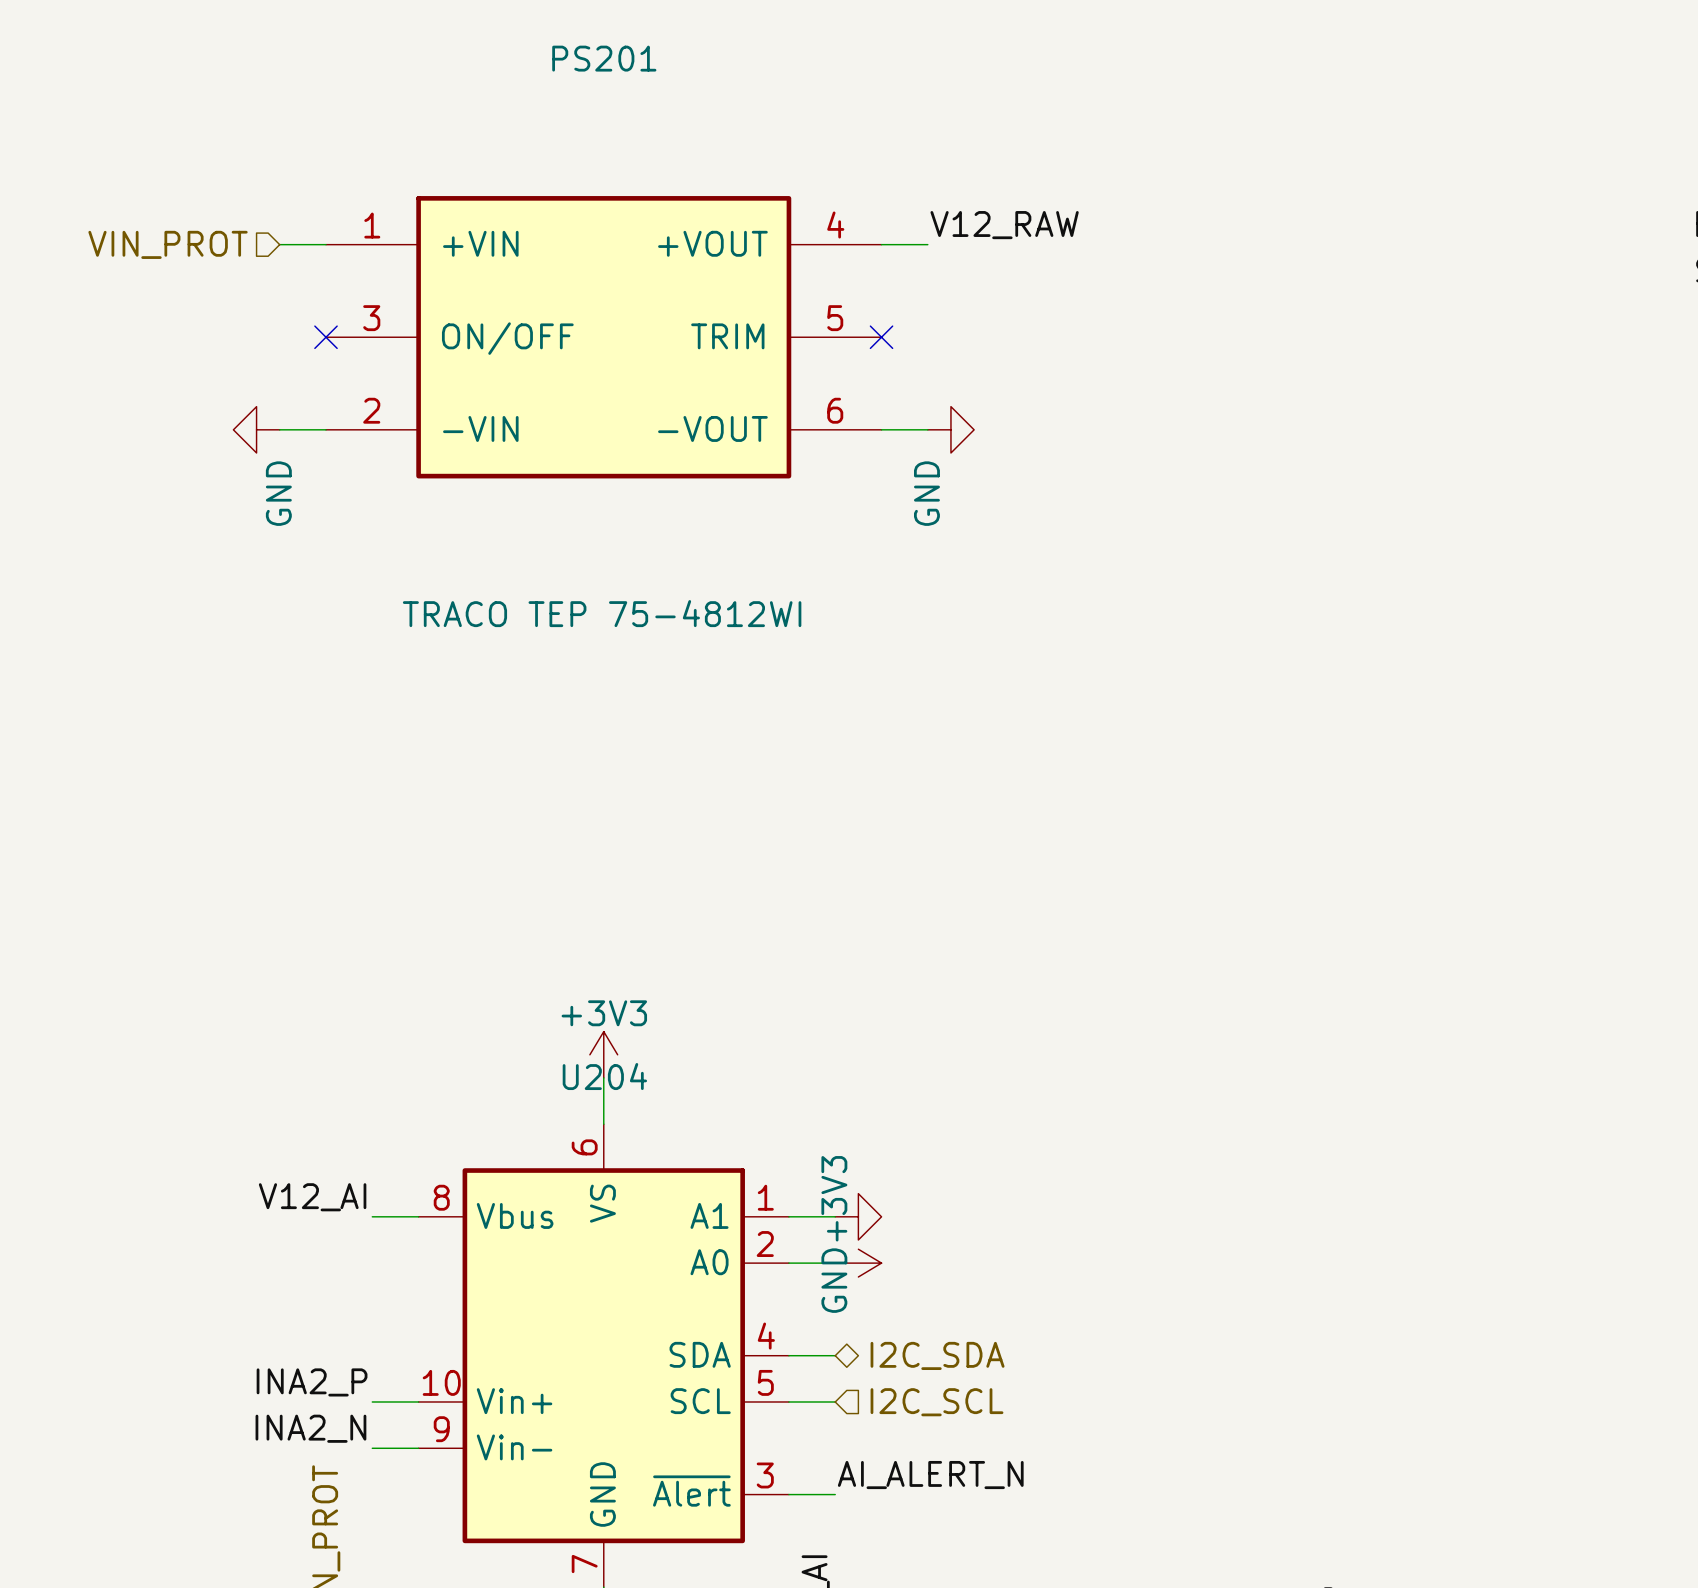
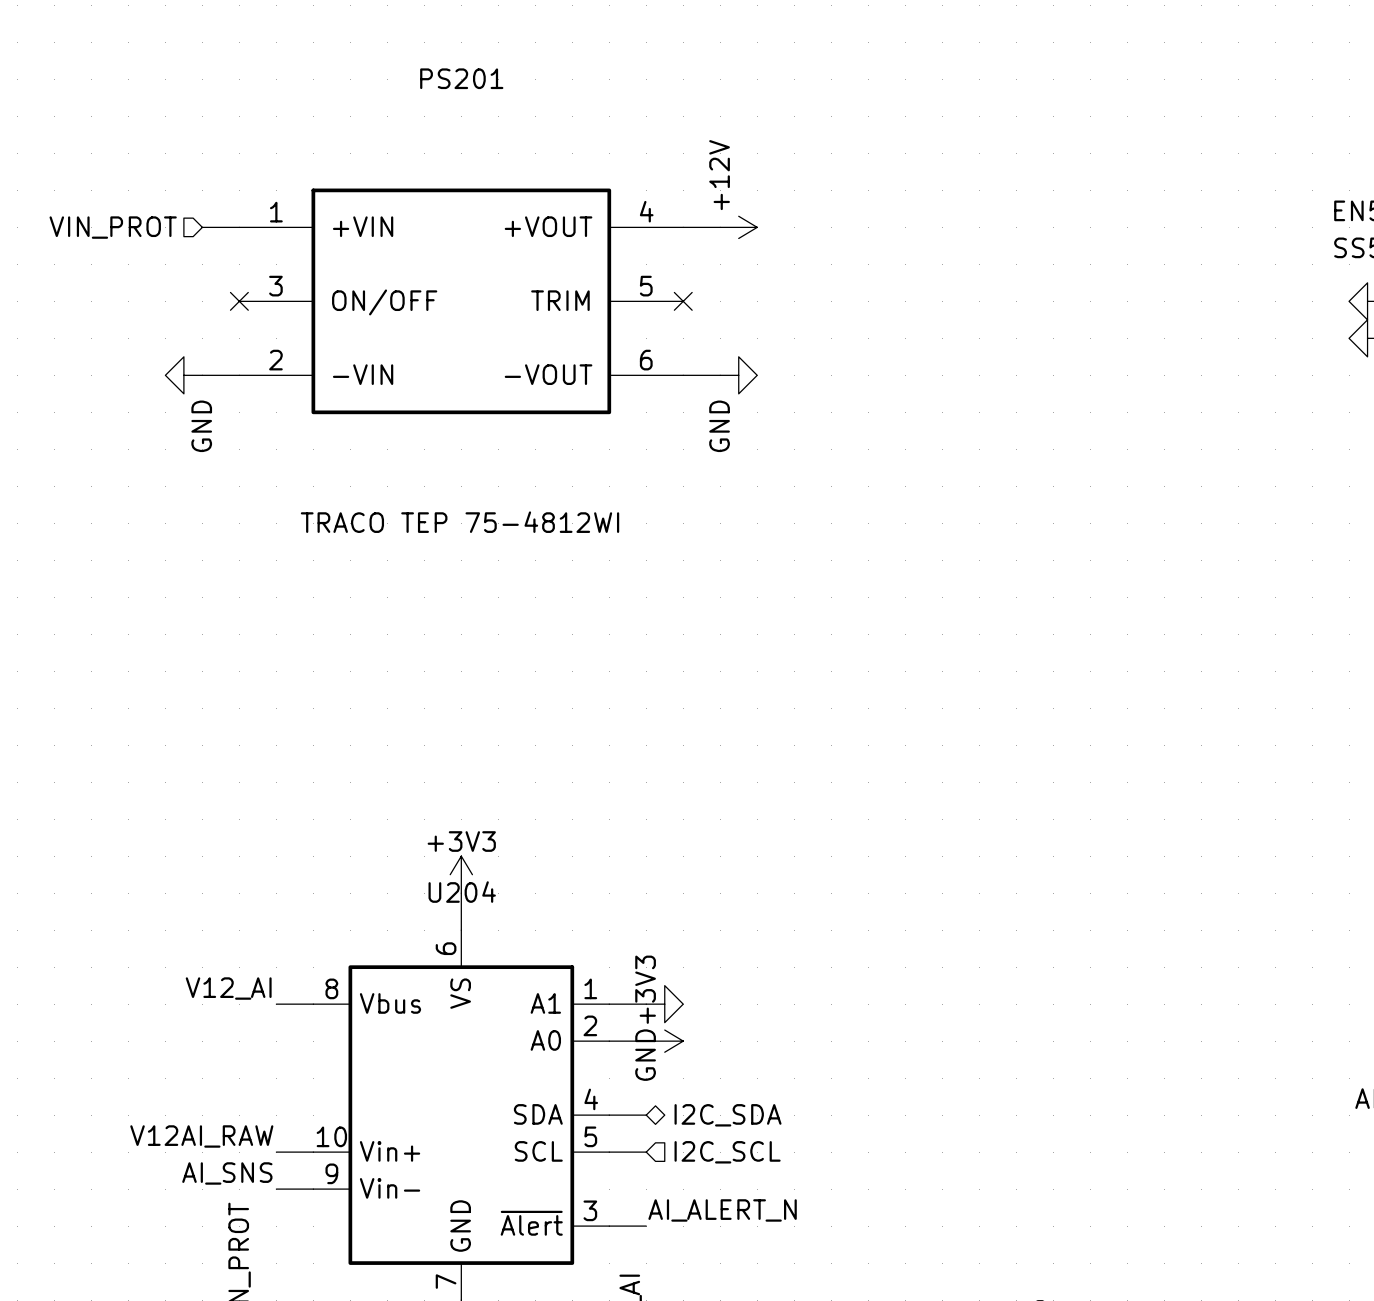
label: V12_RAW (1004, 225) -> none
power symbol: none -> +12V (738, 227)
label: INA2_P (312, 1382) -> V12AI_RAW (201, 1136)
label: INA2_N (310, 1428) -> AI_SNS (227, 1173)

